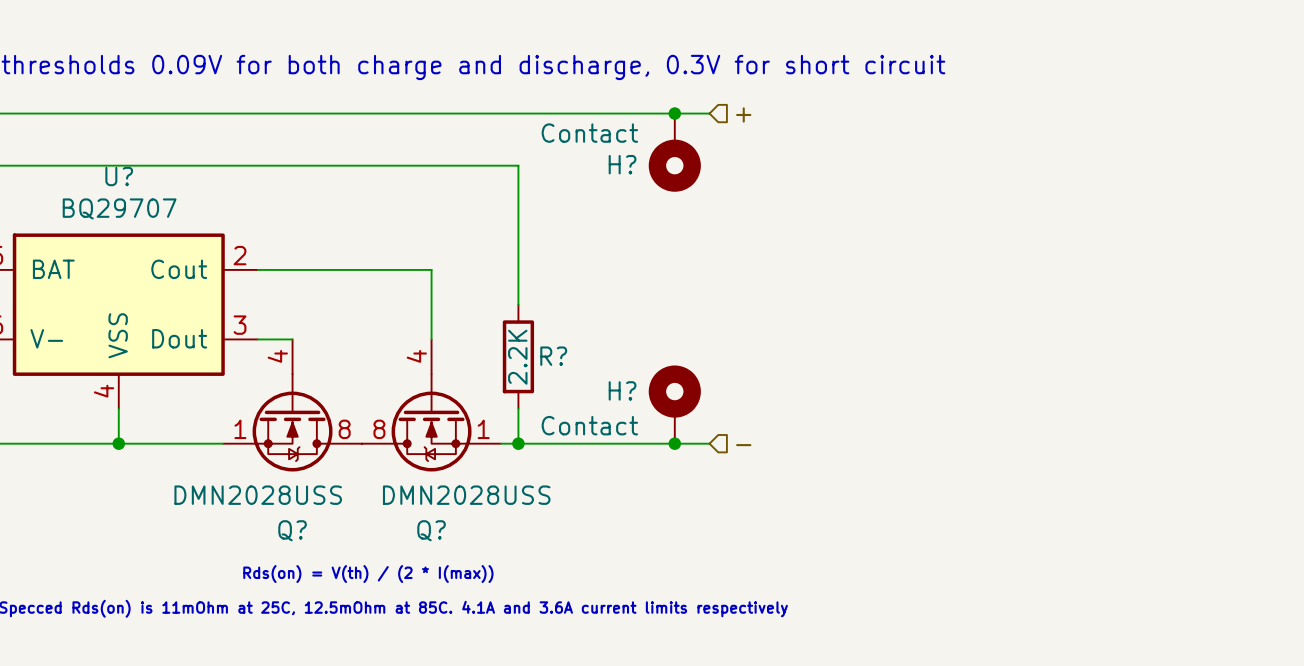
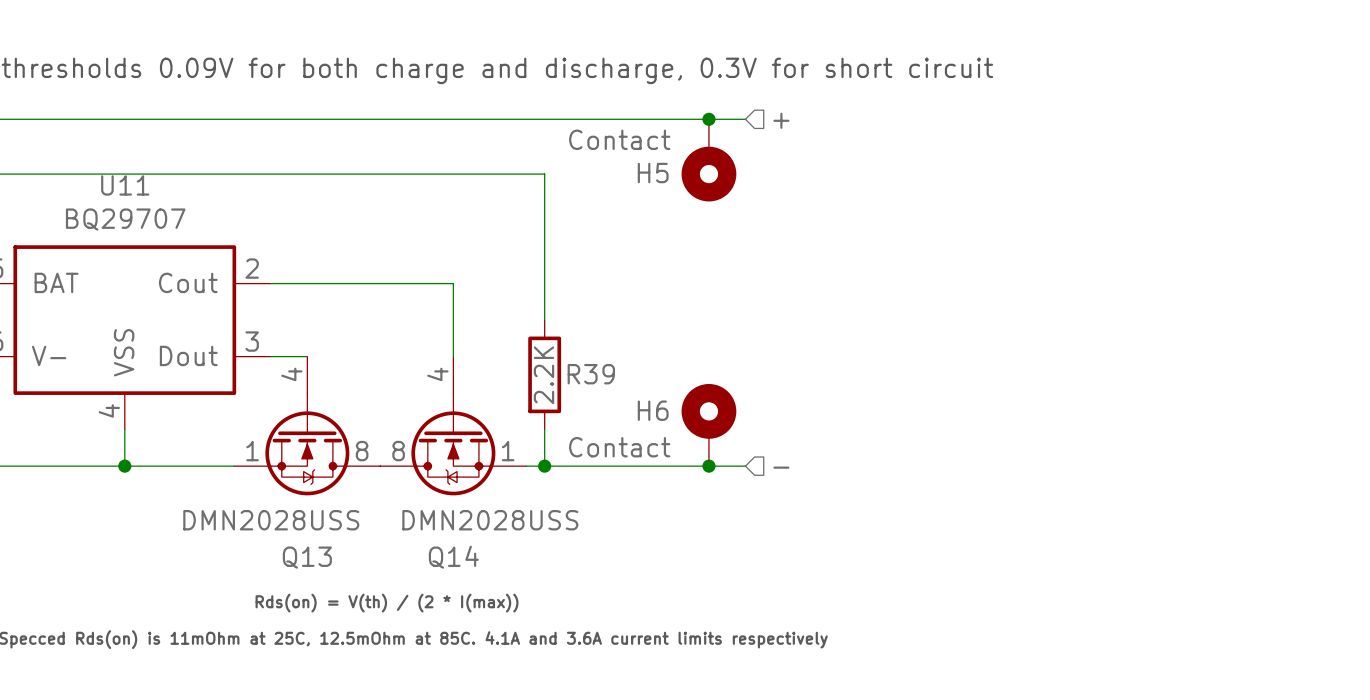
H? name: H? (622, 164) -> H5 (653, 173)
U? name: U? (119, 176) -> U11 (125, 185)
R? name: R? (553, 356) -> R39 (591, 374)
H? name: H? (622, 390) -> H6 (653, 410)
Q? name: Q? (292, 530) -> Q13 (307, 557)
Q? name: Q? (431, 530) -> Q14 (453, 557)

